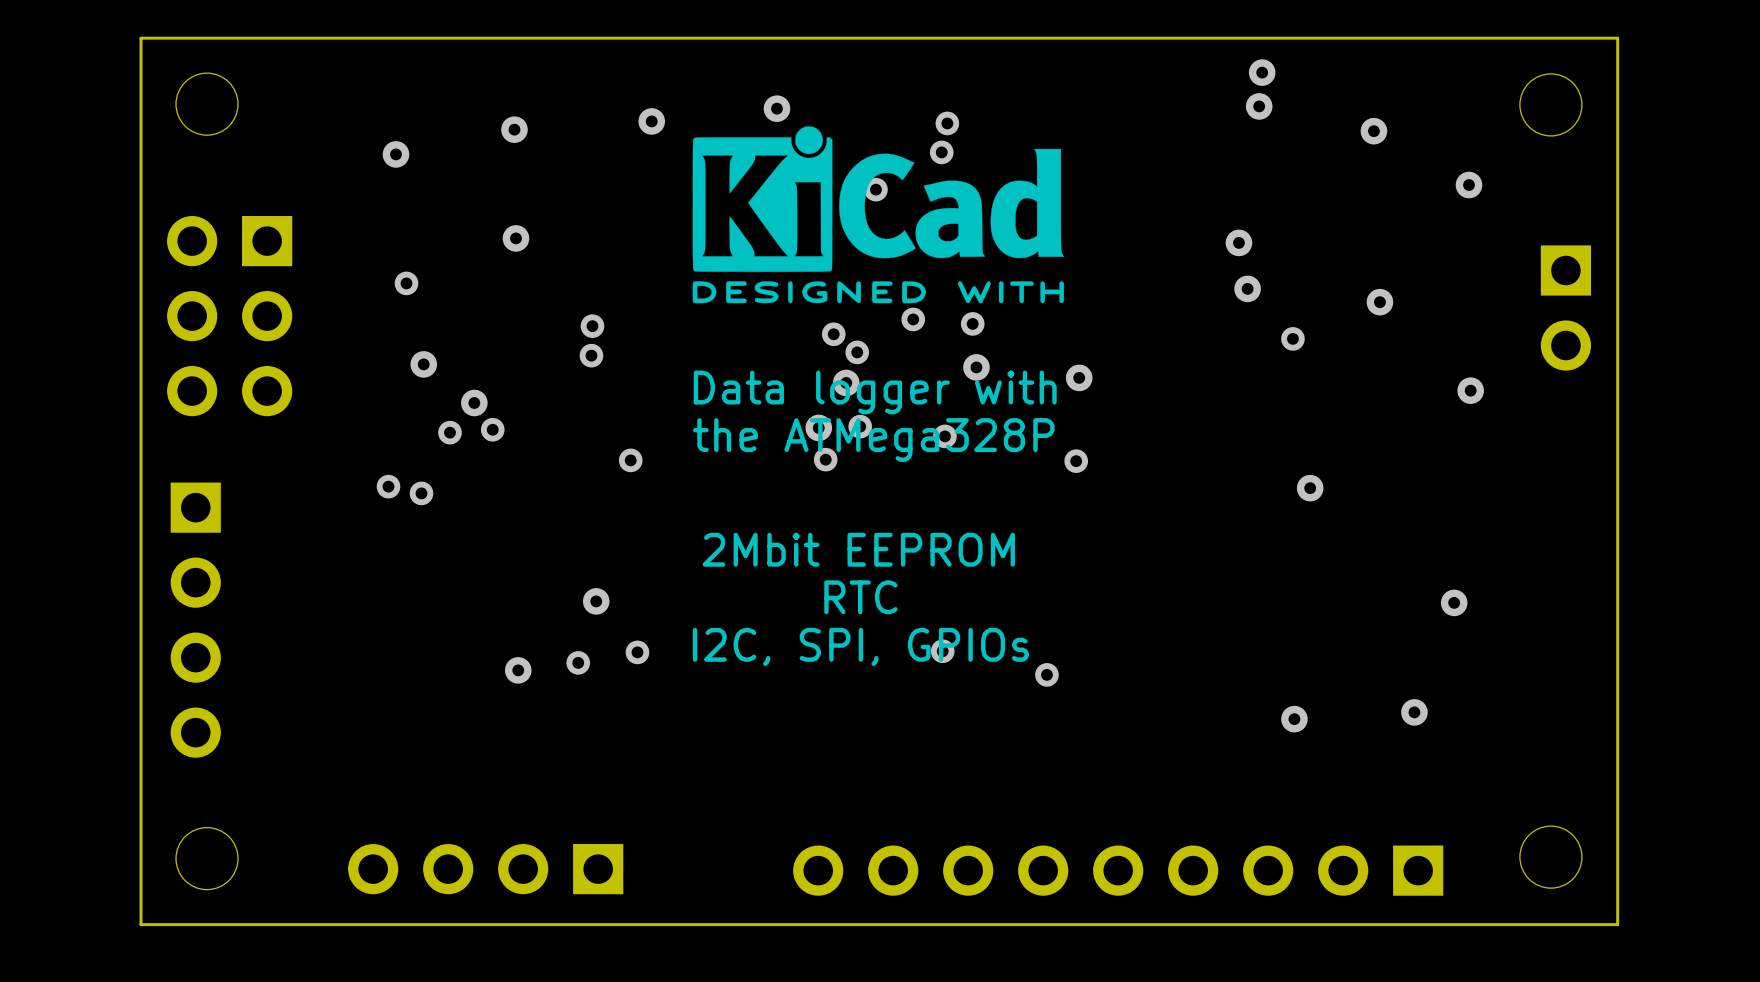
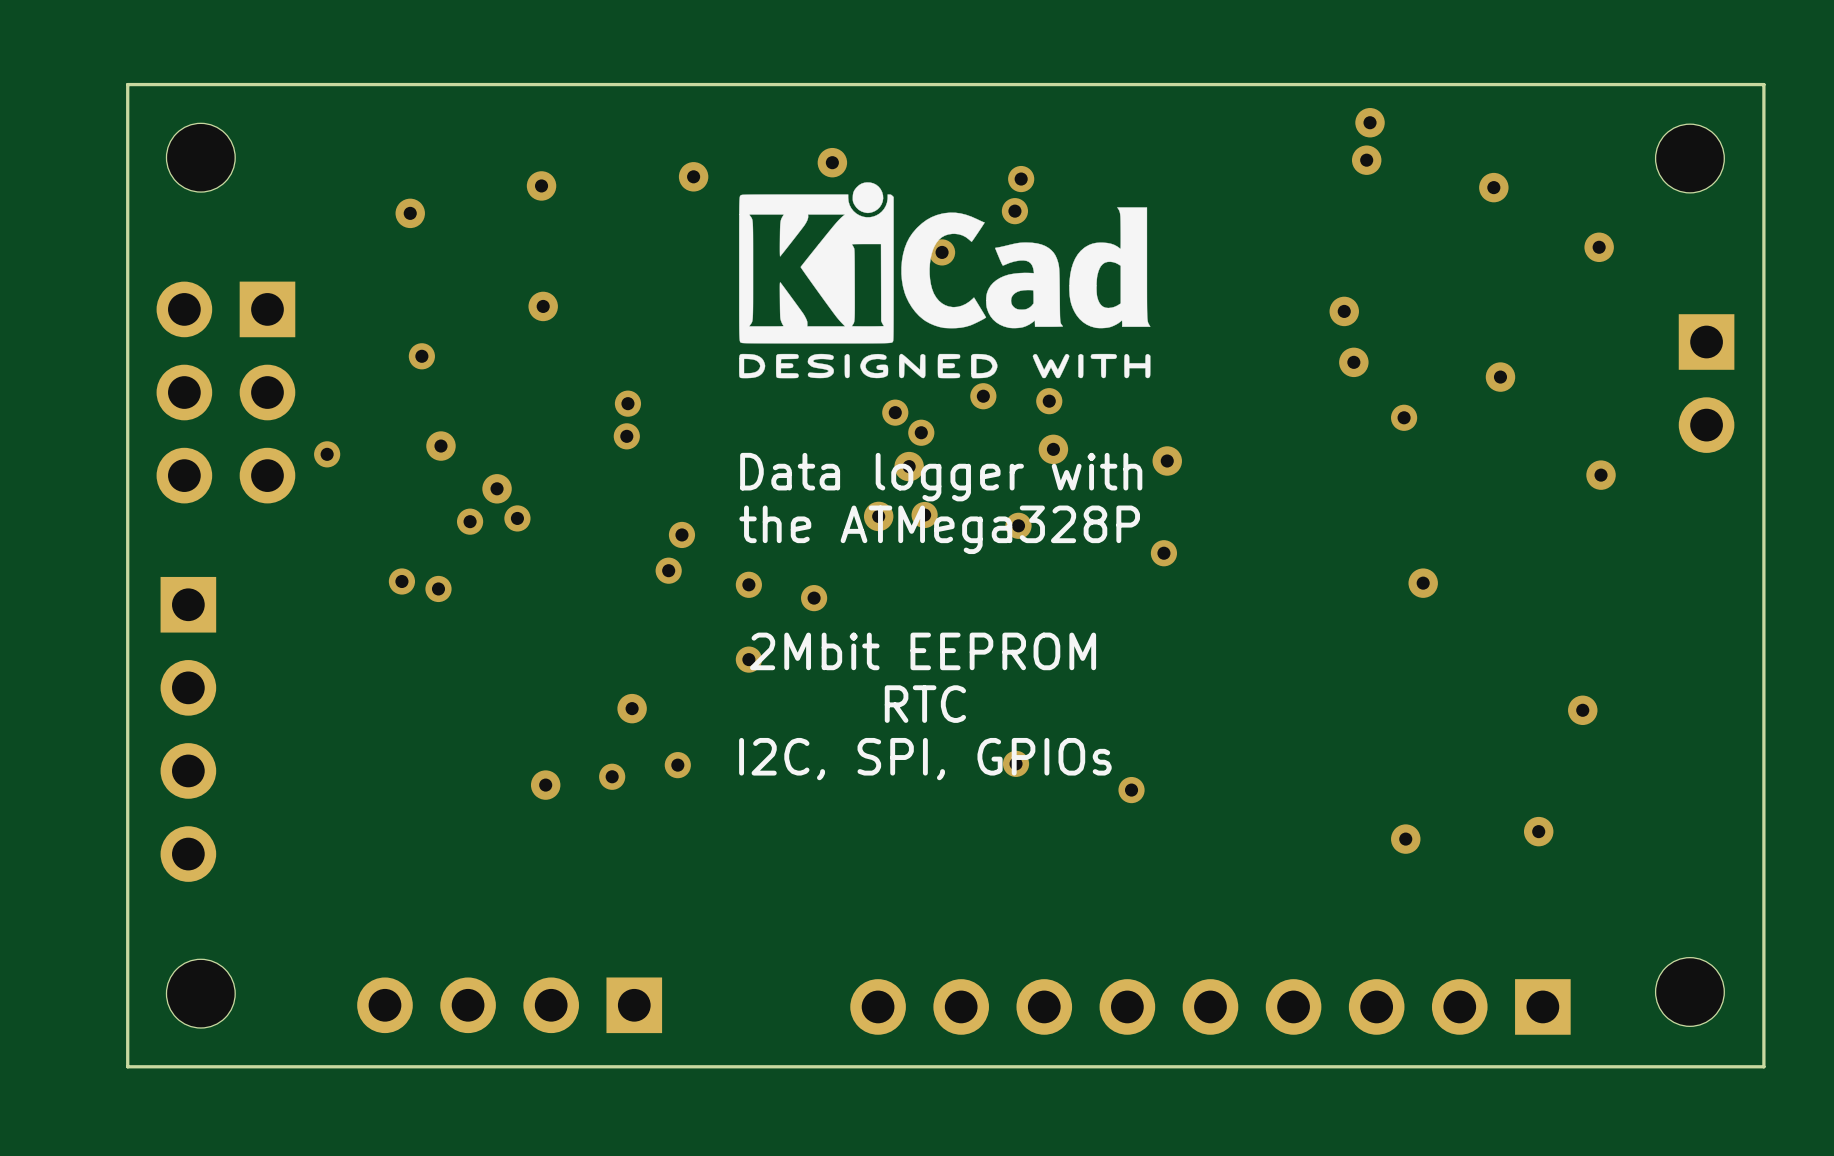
via: none -> (327, 454)
via: none -> (681, 534)
via: (825, 459) -> none
via: (630, 460) -> none
via: none -> (668, 570)
via: none -> (748, 584)
via: none -> (814, 598)
via: none -> (748, 659)

